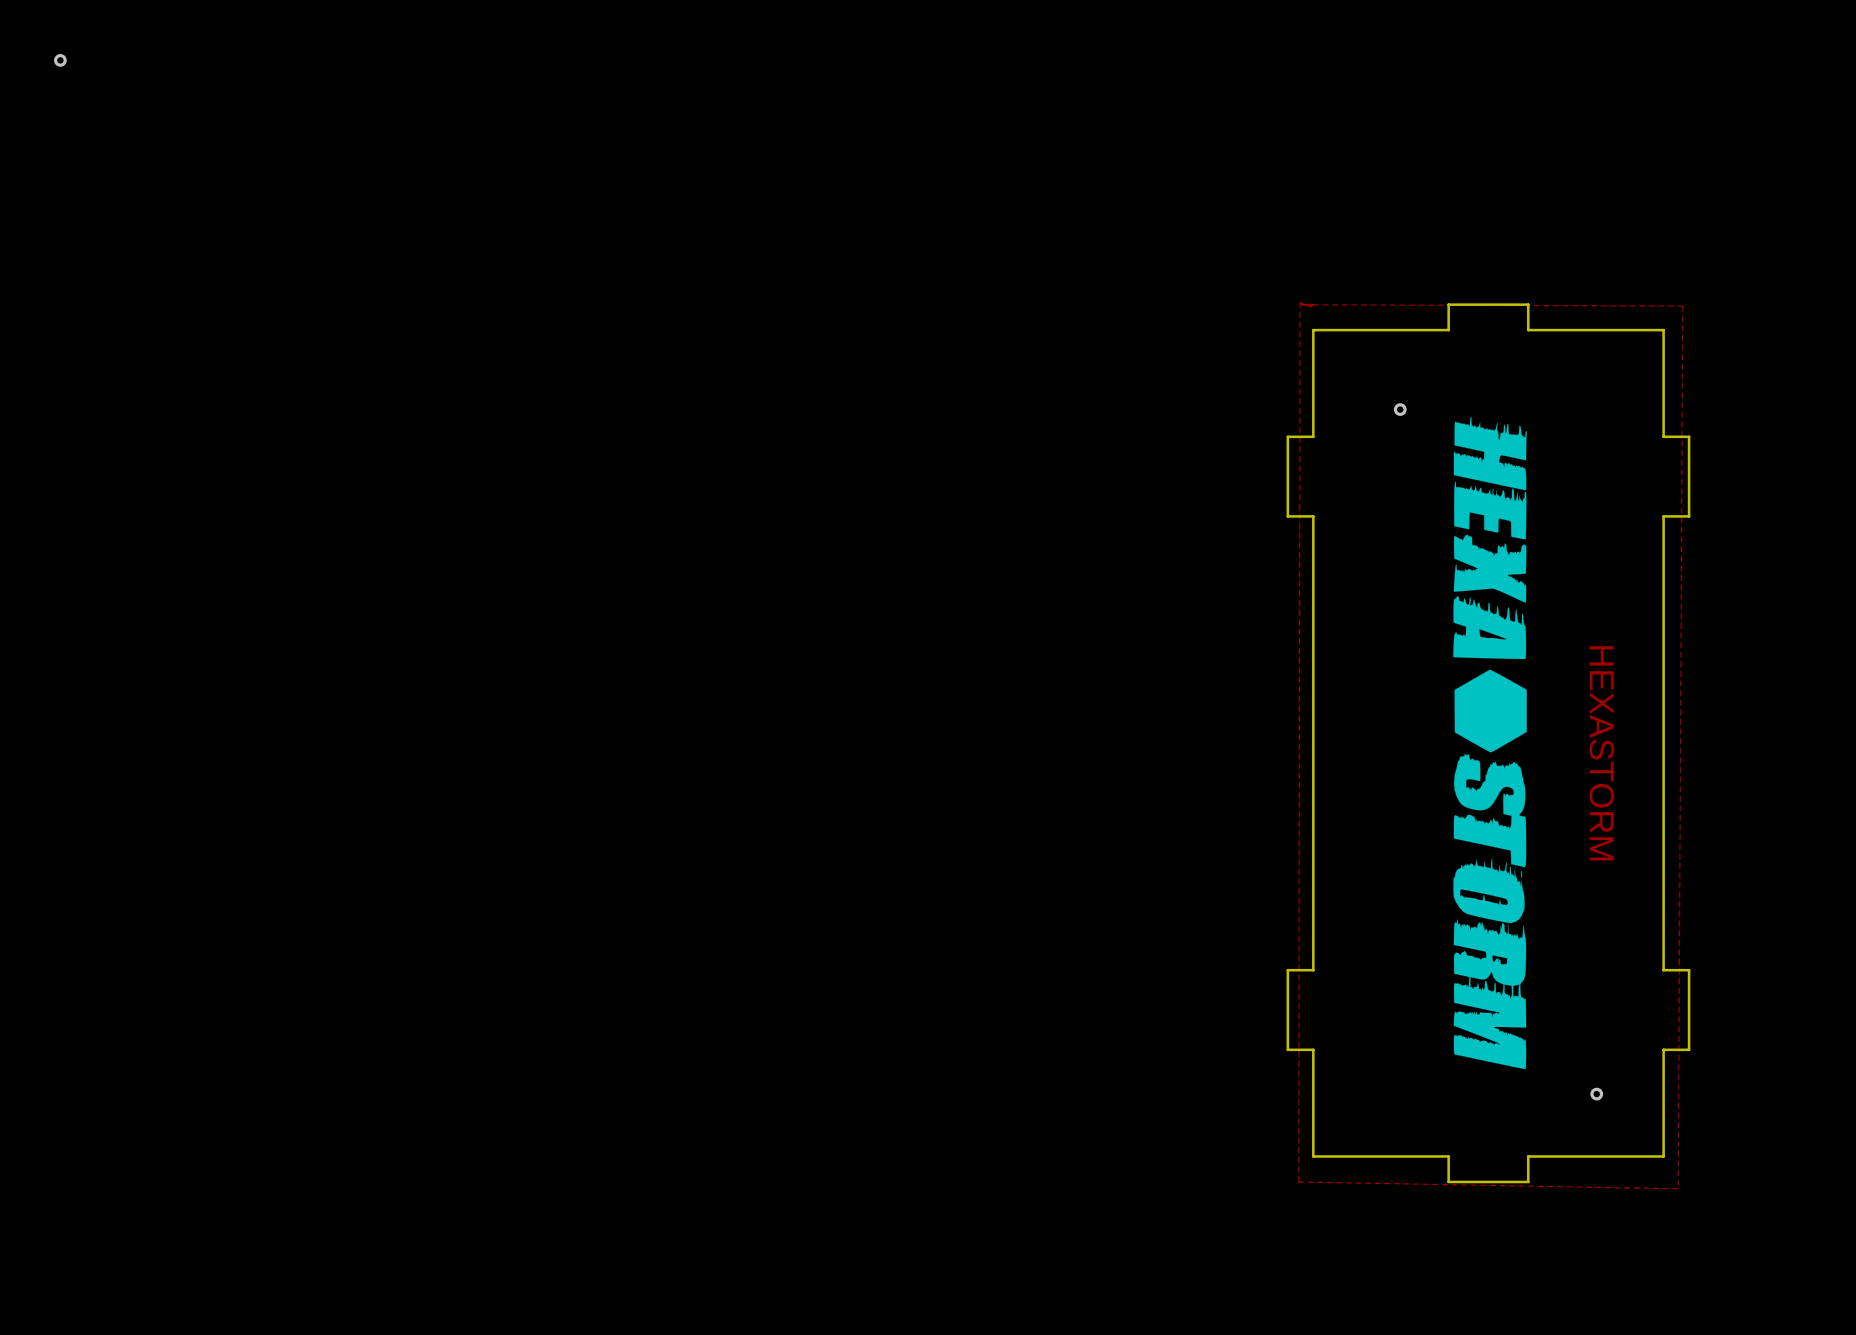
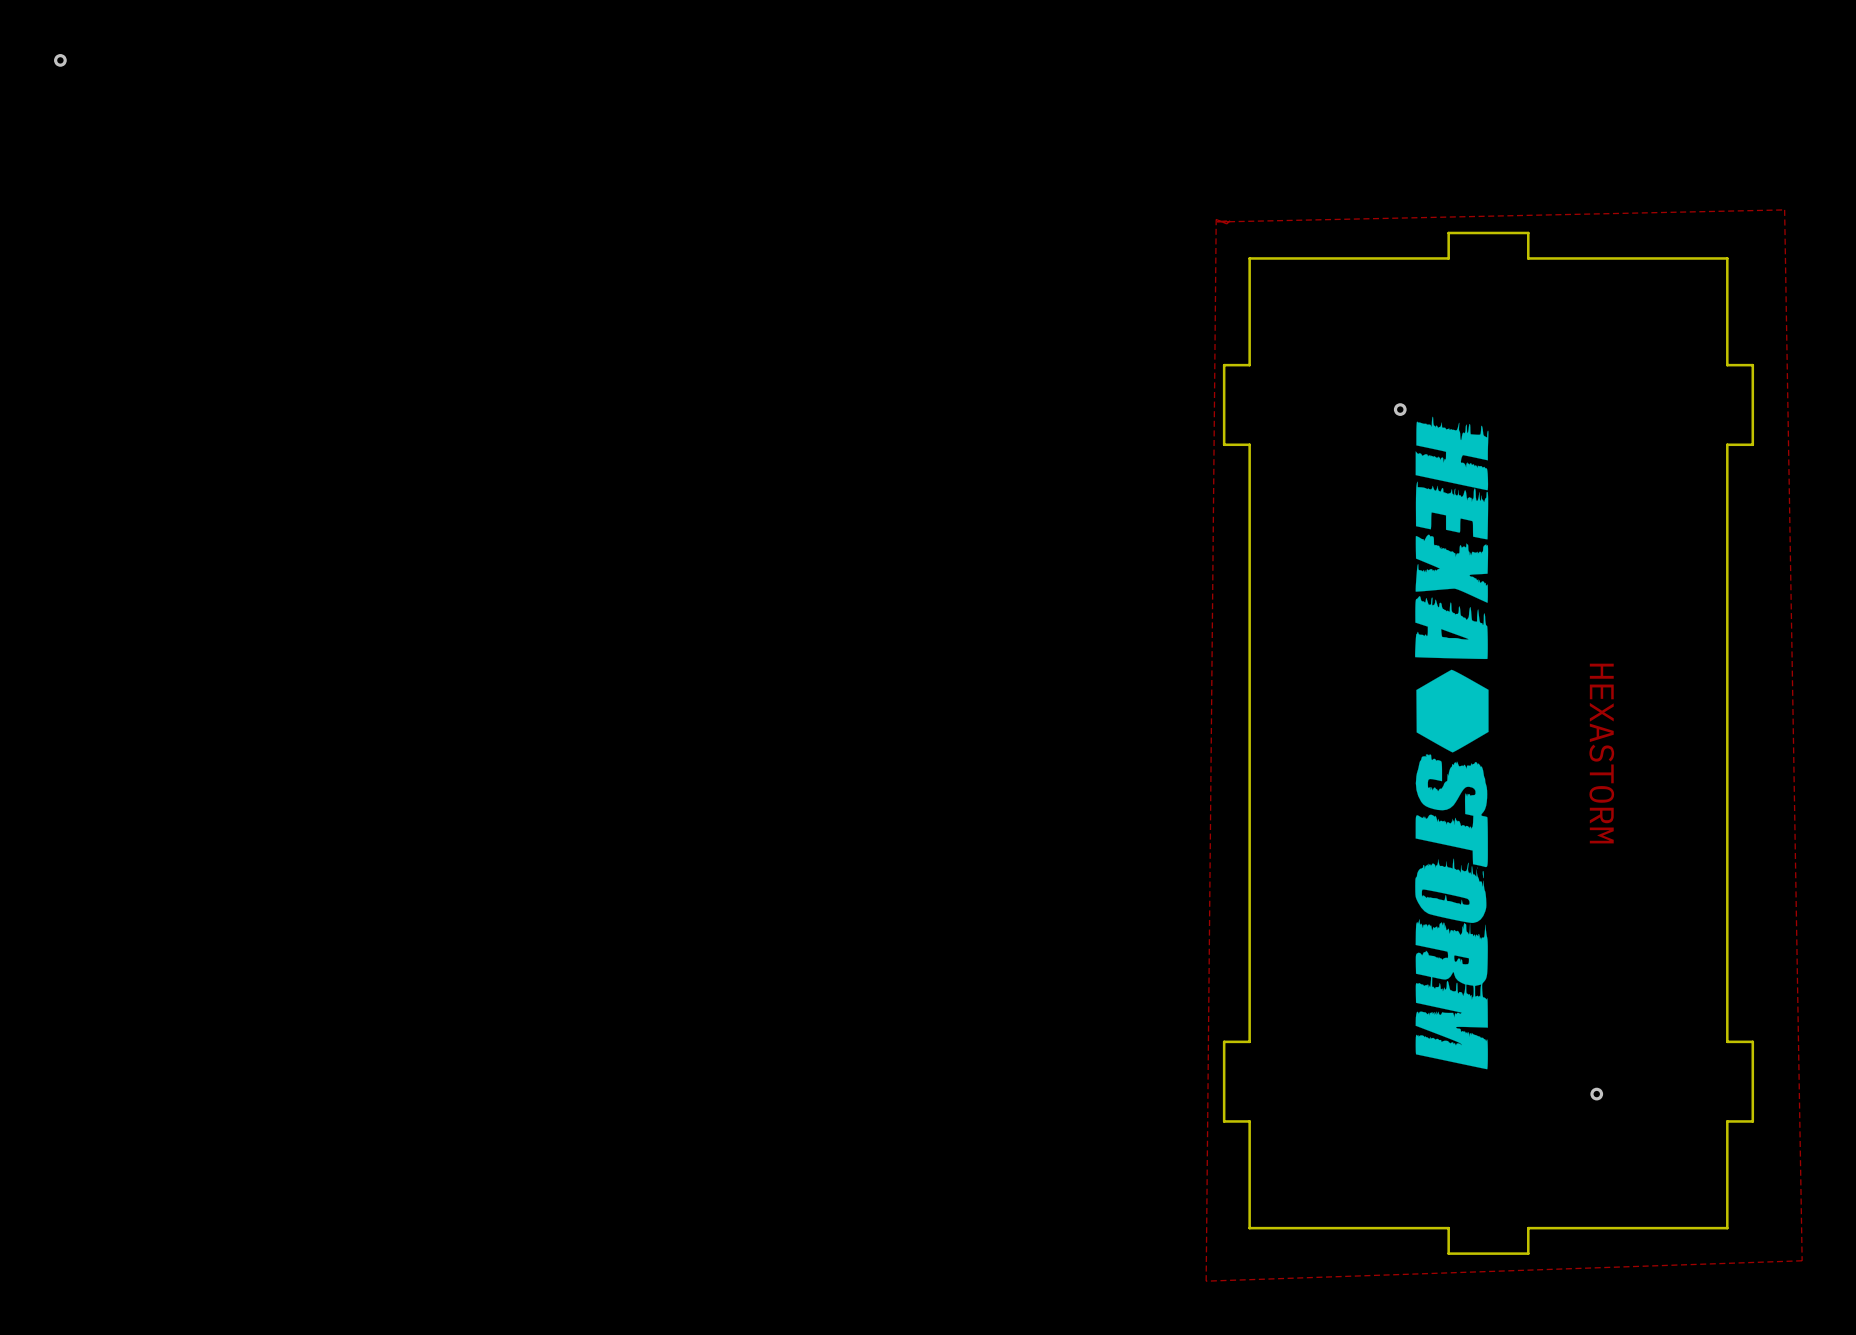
zone outline: (1300, 302) (1310, 307) (1313, 303) (1301, 304) (1682, 306) (1678, 1188) (1298, 1181) (1300, 302) -> (1784, 209) (1229, 221) (1217, 221) (1230, 220) (1226, 223) (1216, 219) (1206, 1281) (1802, 1260) (1784, 209)
board edge: (1448, 304) (1448, 330) (1313, 330) (1313, 436) (1287, 436) (1287, 516) (1313, 516) (1313, 970) (1287, 970) (1287, 1049) (1313, 1049) (1313, 1156) (1448, 1156) (1448, 1181) (1528, 1181) (1528, 1156) (1663, 1156) (1663, 1049) (1689, 1049) (1689, 970) (1663, 970) (1663, 516) (1689, 516) (1689, 436) (1663, 436) (1663, 330) (1528, 330) (1528, 304) (1448, 304) -> (1448, 232) (1448, 258) (1249, 258) (1249, 365) (1224, 365) (1224, 444) (1249, 444) (1249, 1041) (1224, 1041) (1224, 1121) (1249, 1121) (1249, 1228) (1448, 1228) (1448, 1253) (1528, 1253) (1528, 1228) (1727, 1228) (1727, 1121) (1752, 1121) (1752, 1041) (1727, 1041) (1727, 444) (1752, 444) (1752, 365) (1727, 365) (1727, 258) (1528, 258) (1528, 232) (1448, 232)
drawing position: (1490, 742) -> (1451, 742)

